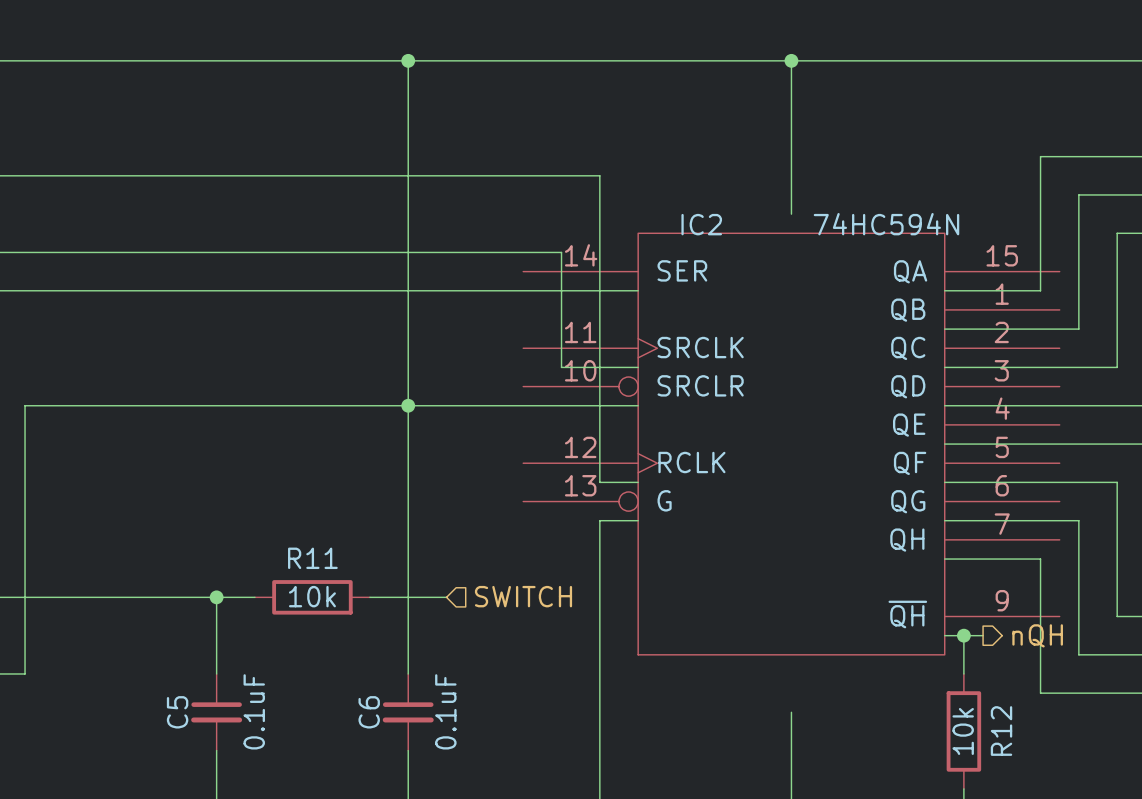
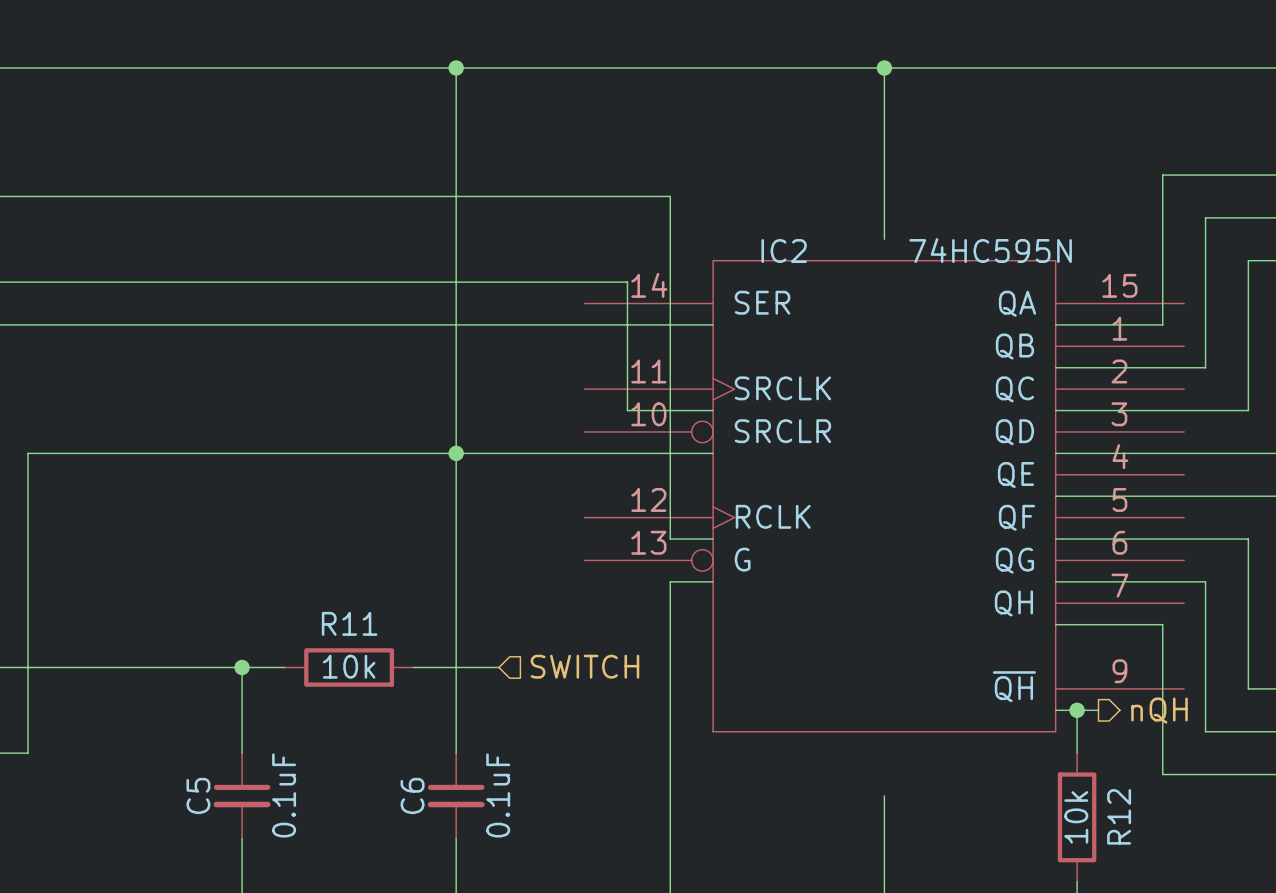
IC2 value: 74HC594N (886, 224) -> 74HC595N (990, 250)

